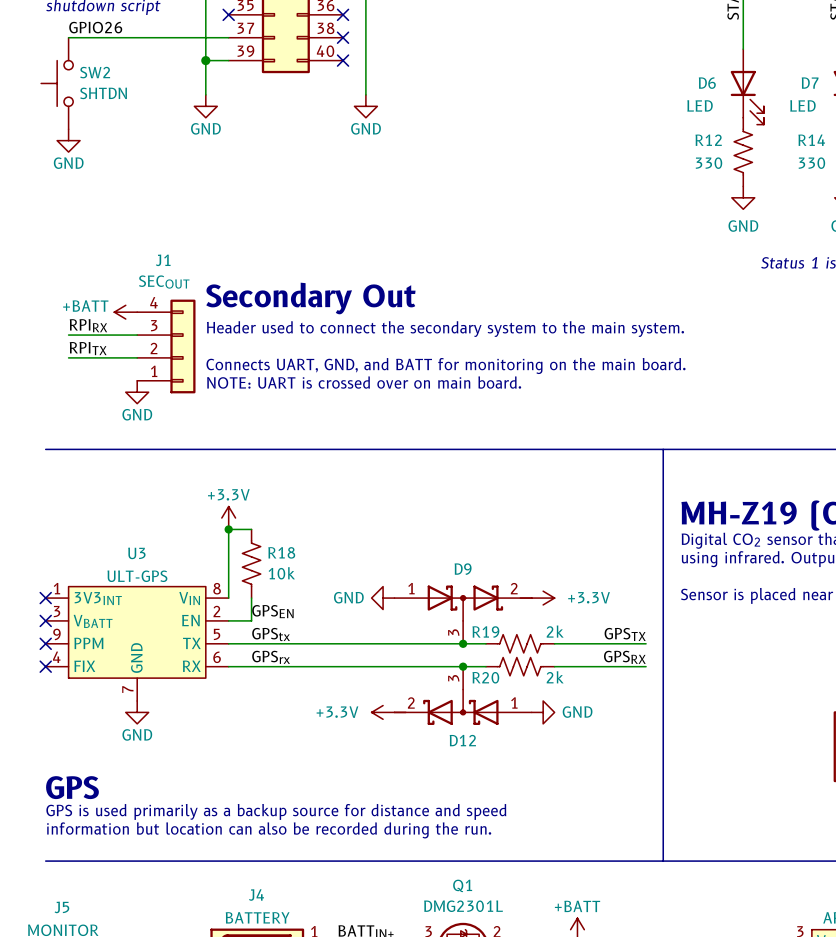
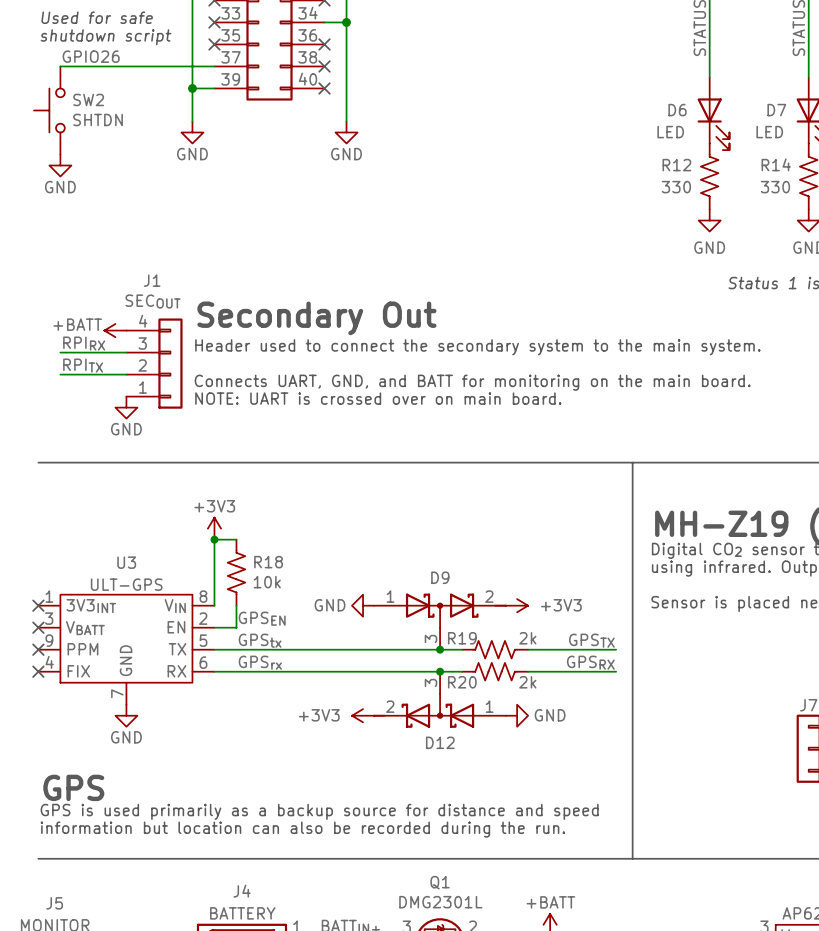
power symbol: +3.3V (228, 518) -> +3V3 (214, 528)
power symbol: +3.3V (543, 598) -> +3V3 (517, 605)
power symbol: +3.3V (383, 712) -> +3V3 (363, 715)

